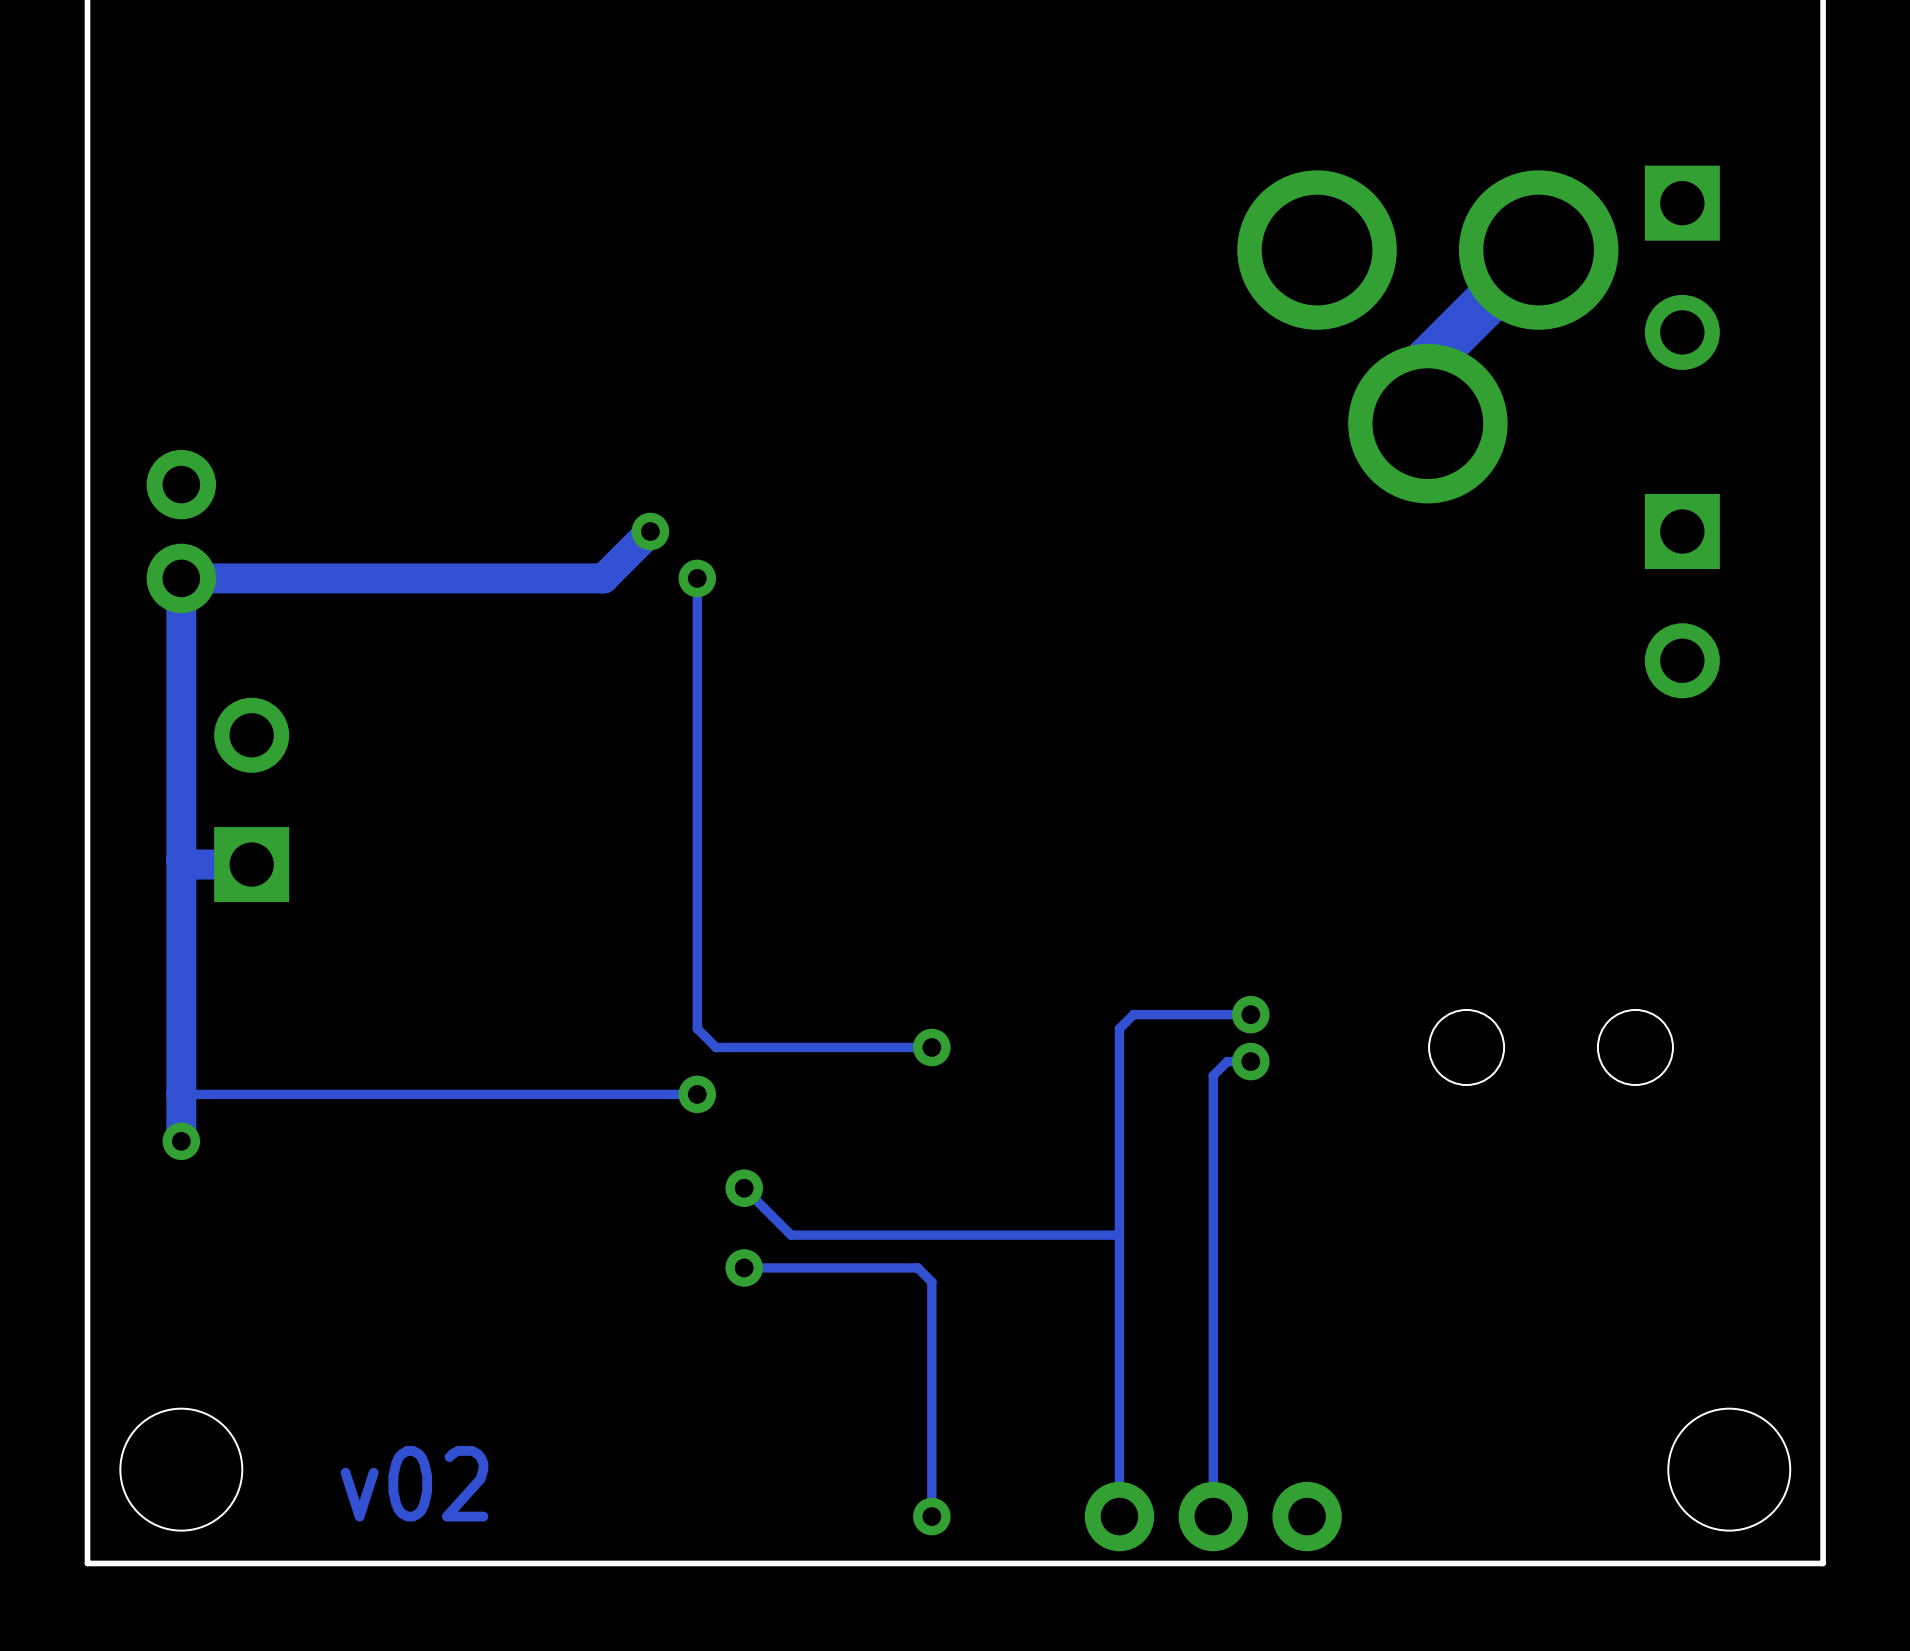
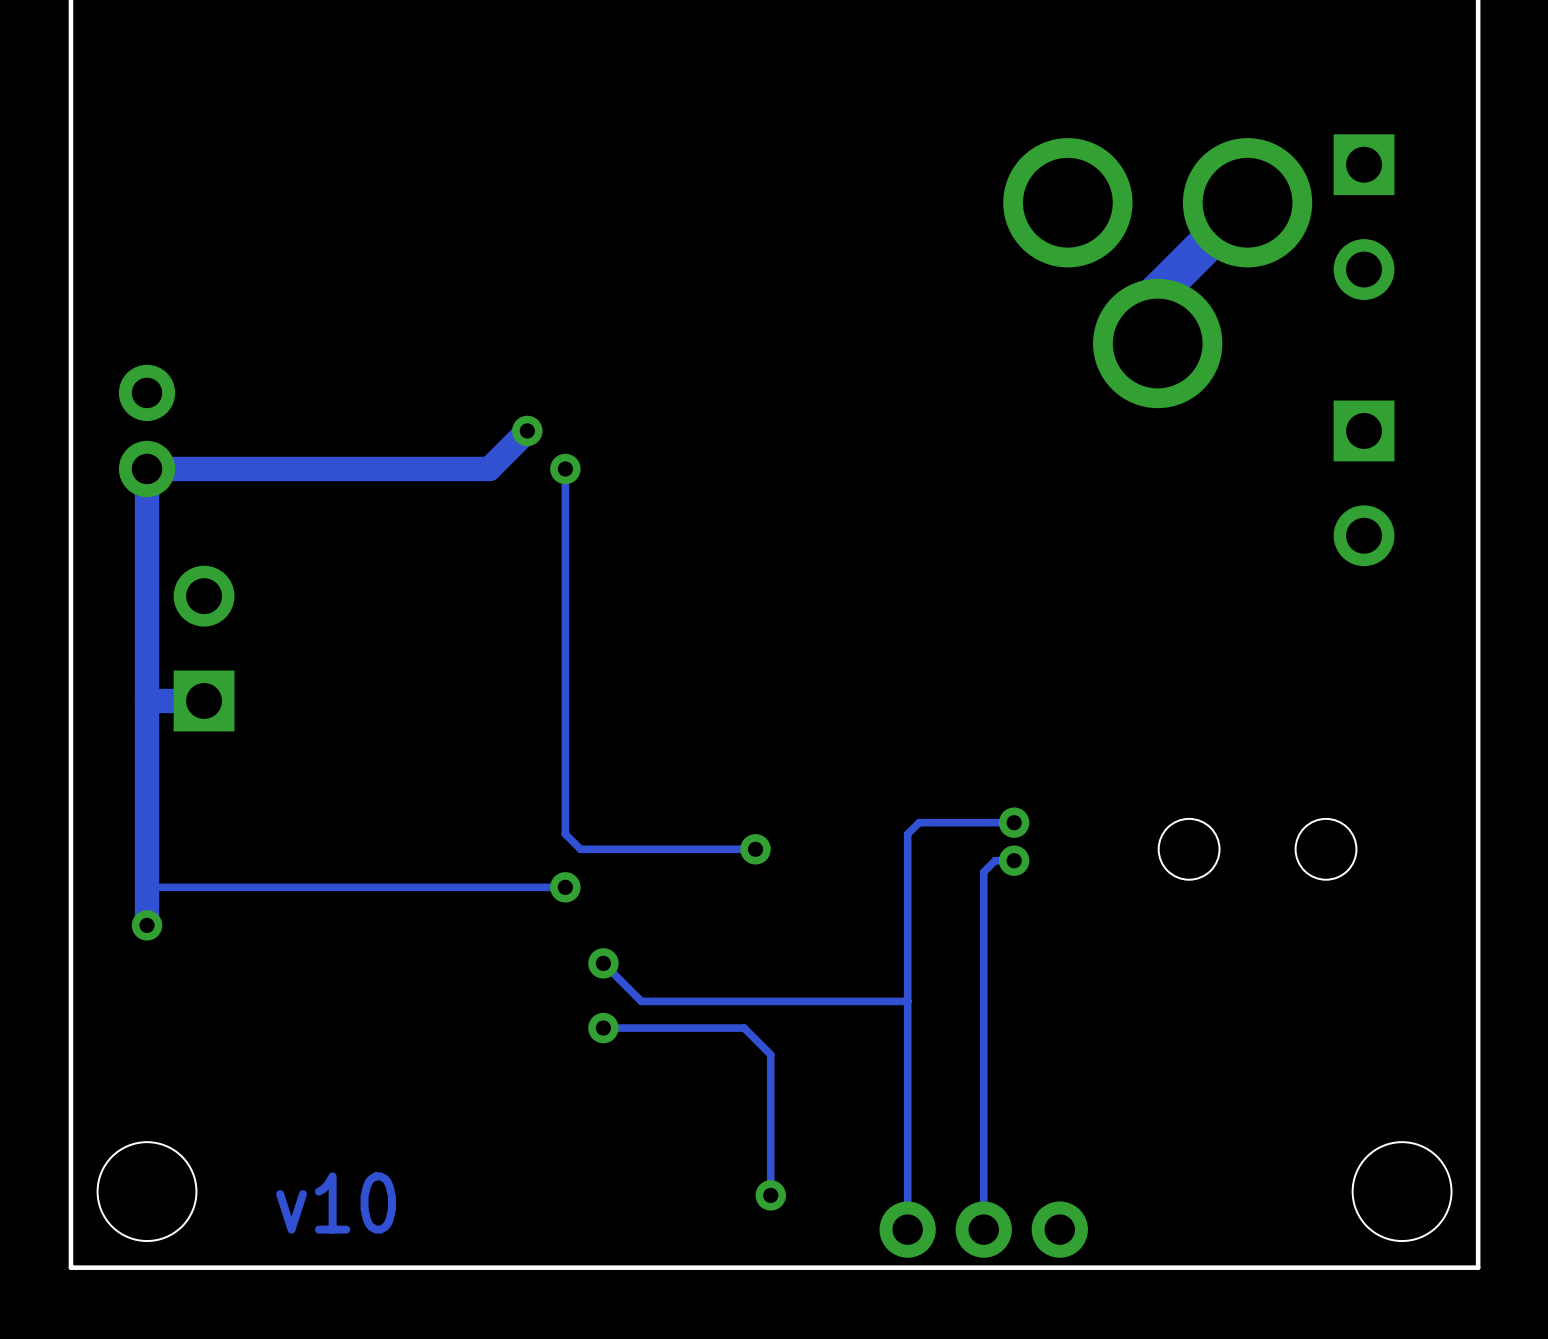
track: (931, 1282) (931, 1516) -> (755, 1039) (770, 1054) (770, 1195)
text: v02 (414, 1483) -> v10 (336, 1203)
via position: (931, 1516) -> (770, 1195)

